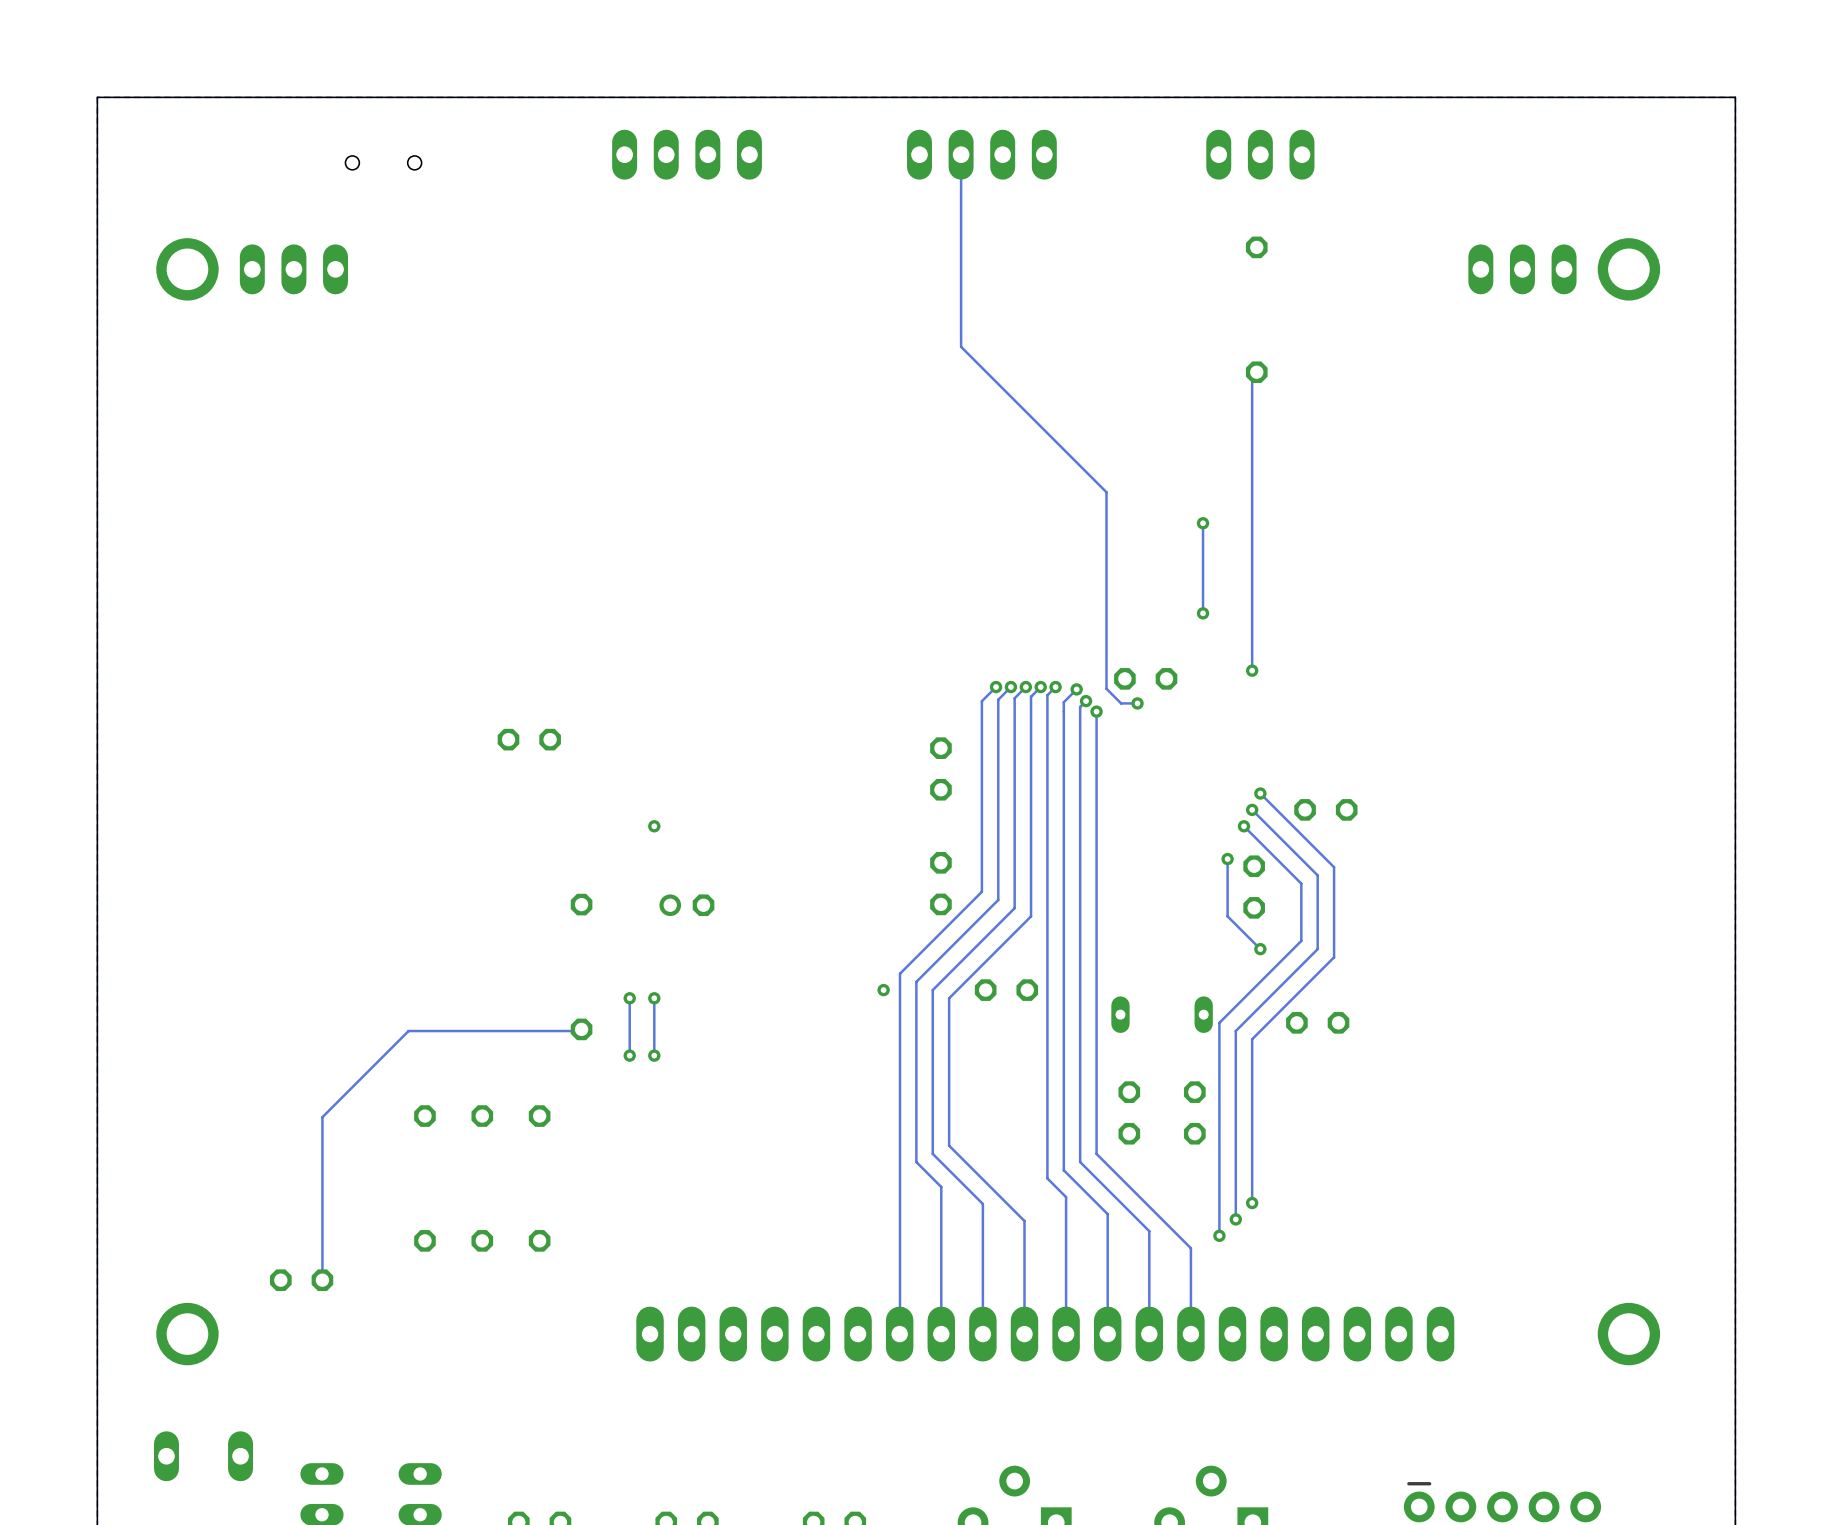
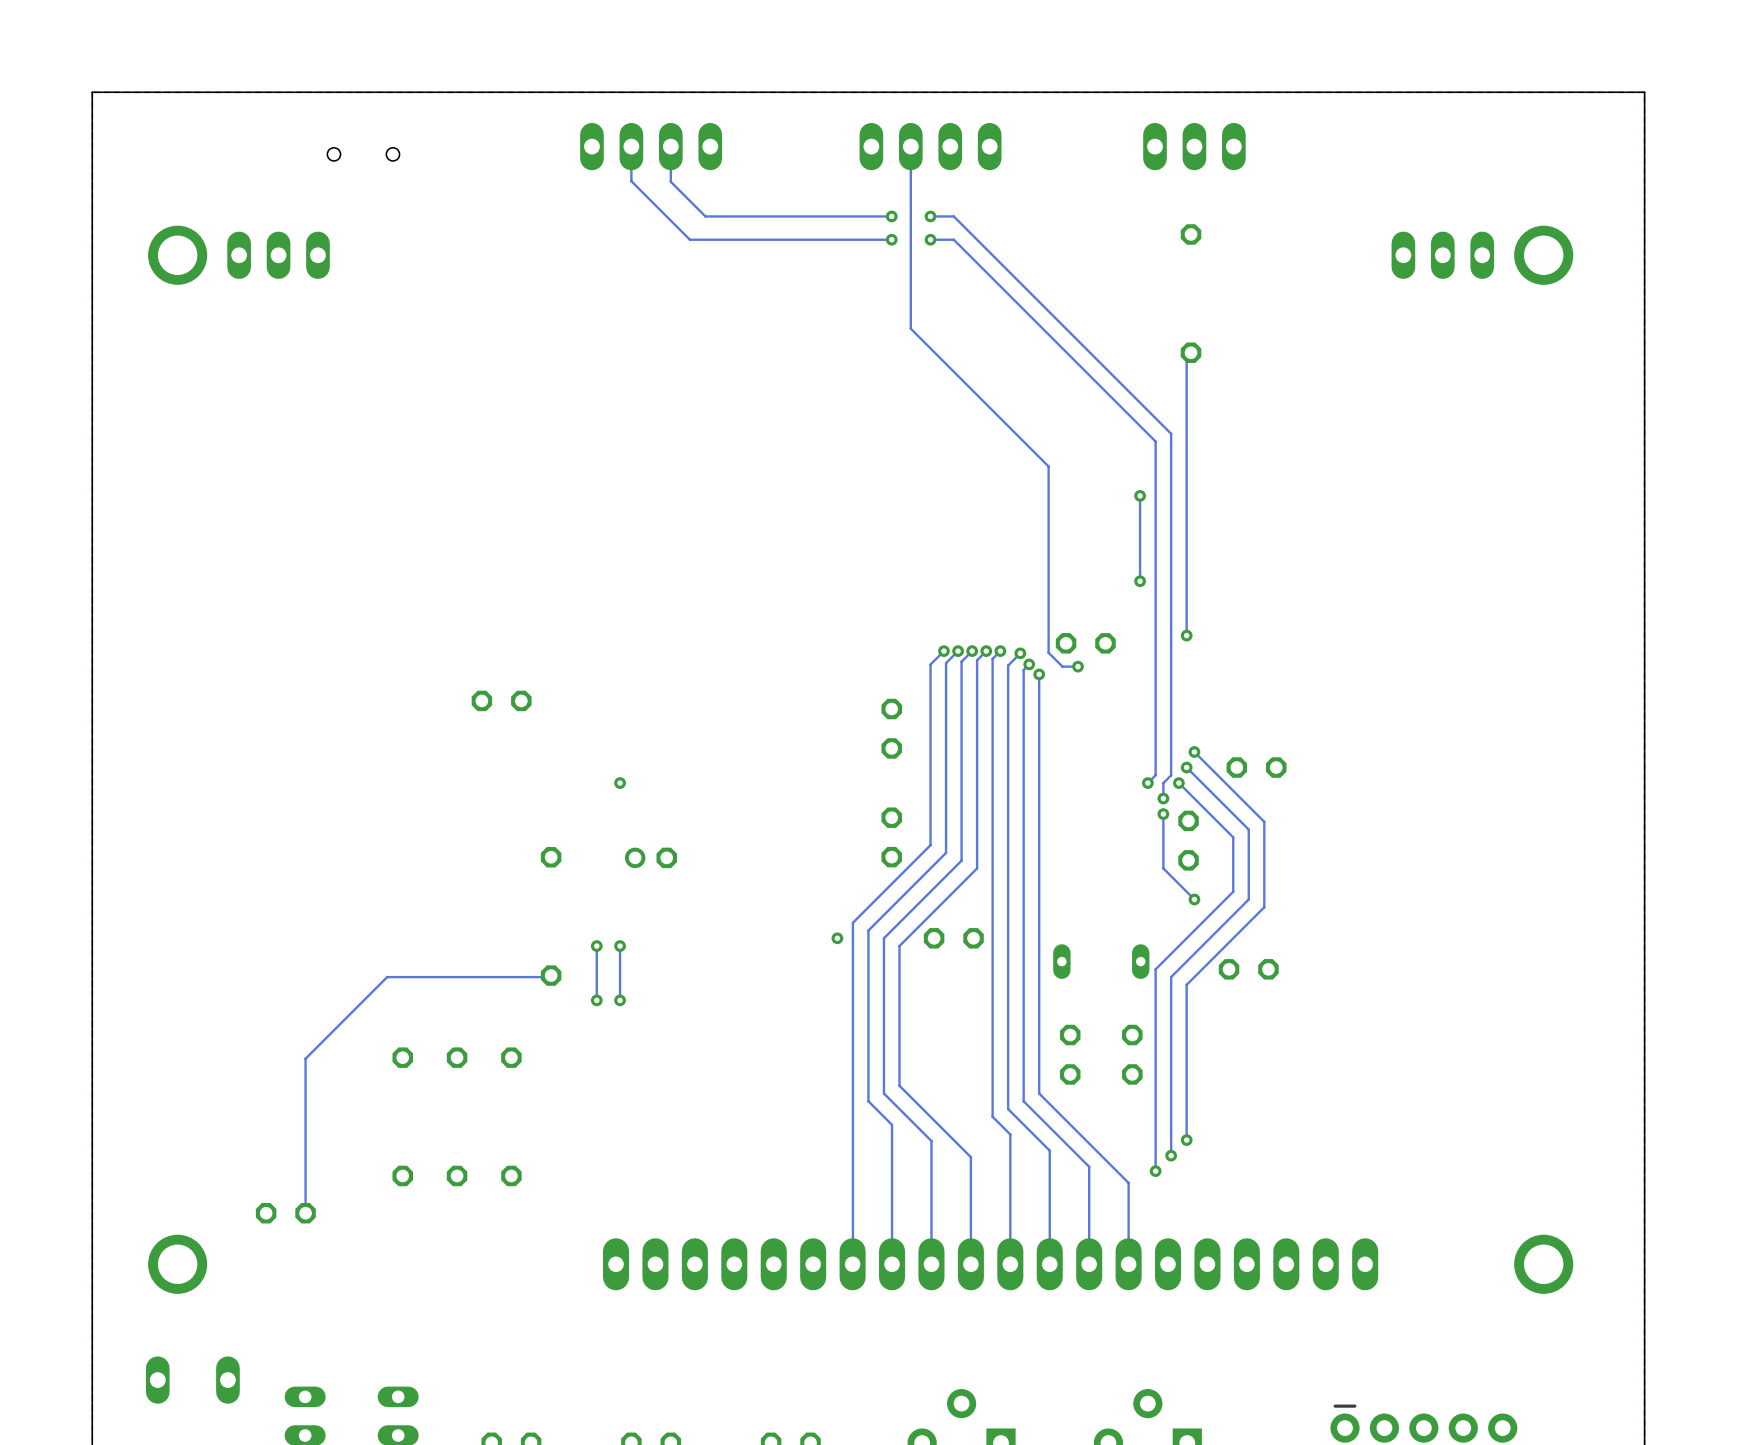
track: none -> (631, 146) (631, 181) (689, 239) (891, 239)
track: none -> (670, 146) (670, 181) (705, 216) (891, 216)
via: none -> (891, 216)
track: none -> (930, 216) (953, 216) (1171, 433) (1171, 775) (1163, 783) (1163, 798)
via: none -> (930, 216)
via: none -> (891, 239)
track: none -> (930, 239) (953, 239) (1155, 441) (1155, 775) (1147, 783)
via: none -> (930, 239)
via: none -> (1147, 783)
via: none -> (1163, 798)

